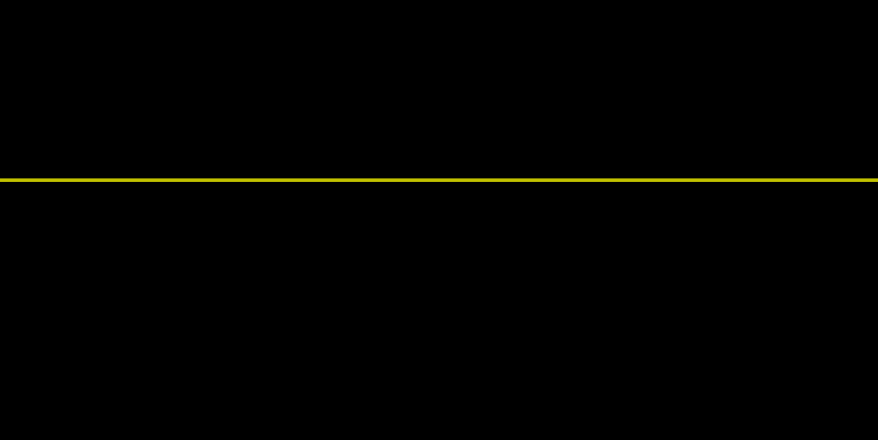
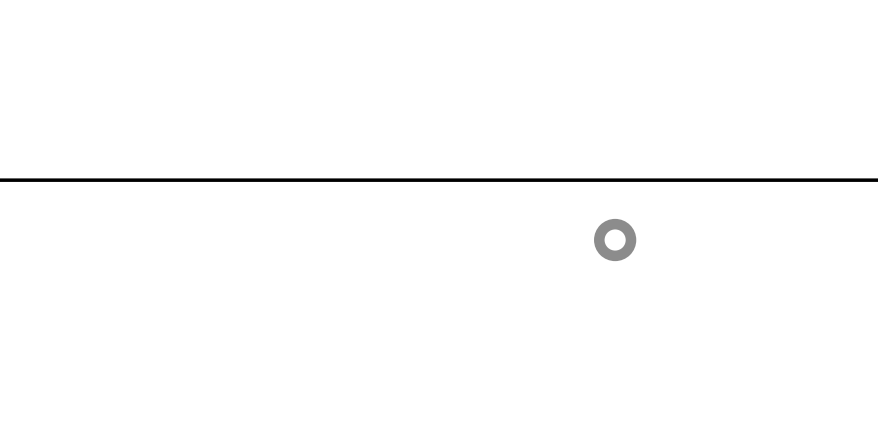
via: none -> (615, 240)

